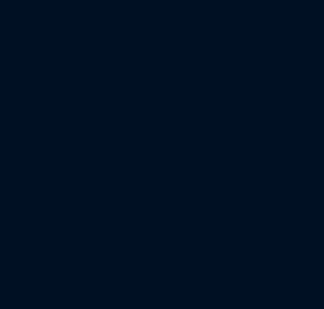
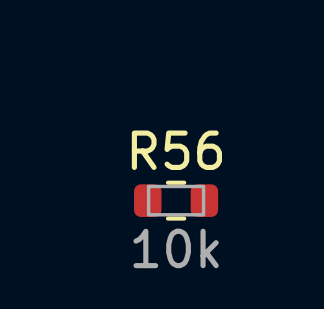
R56: none -> 10k (176, 200)

